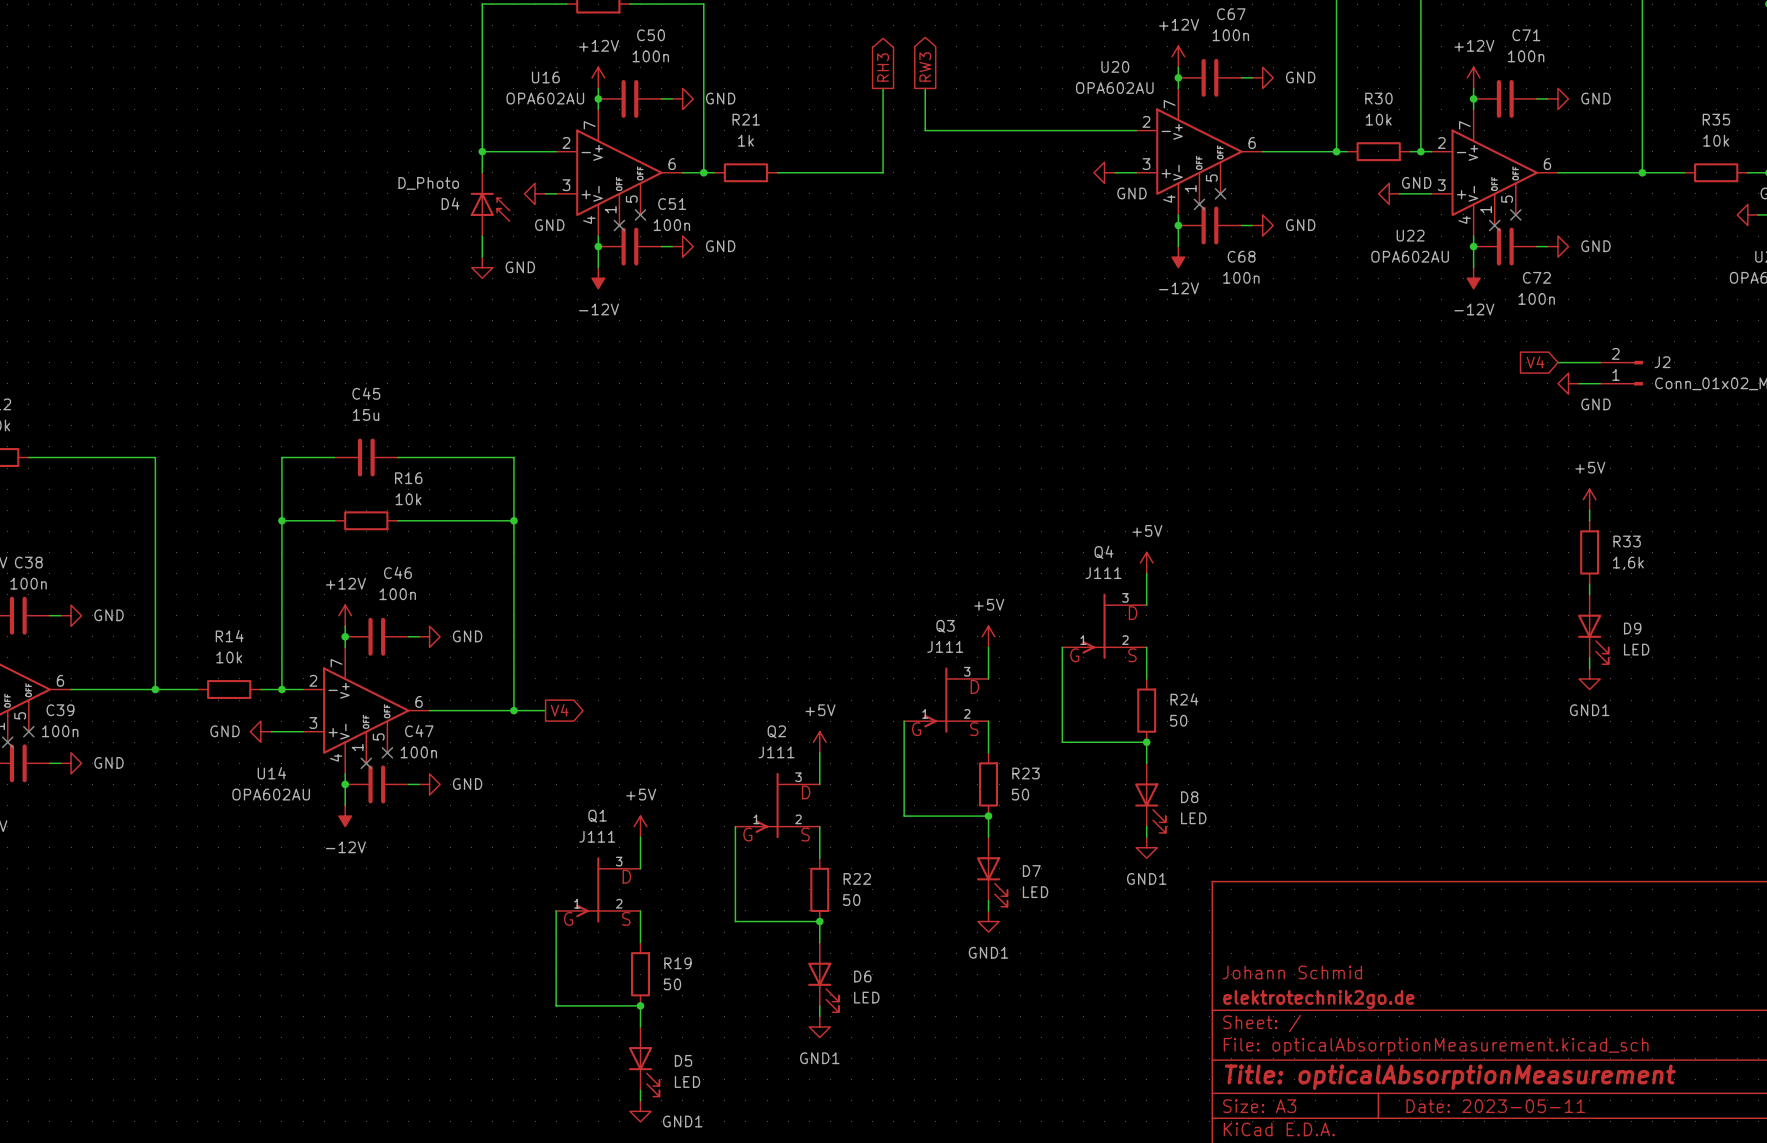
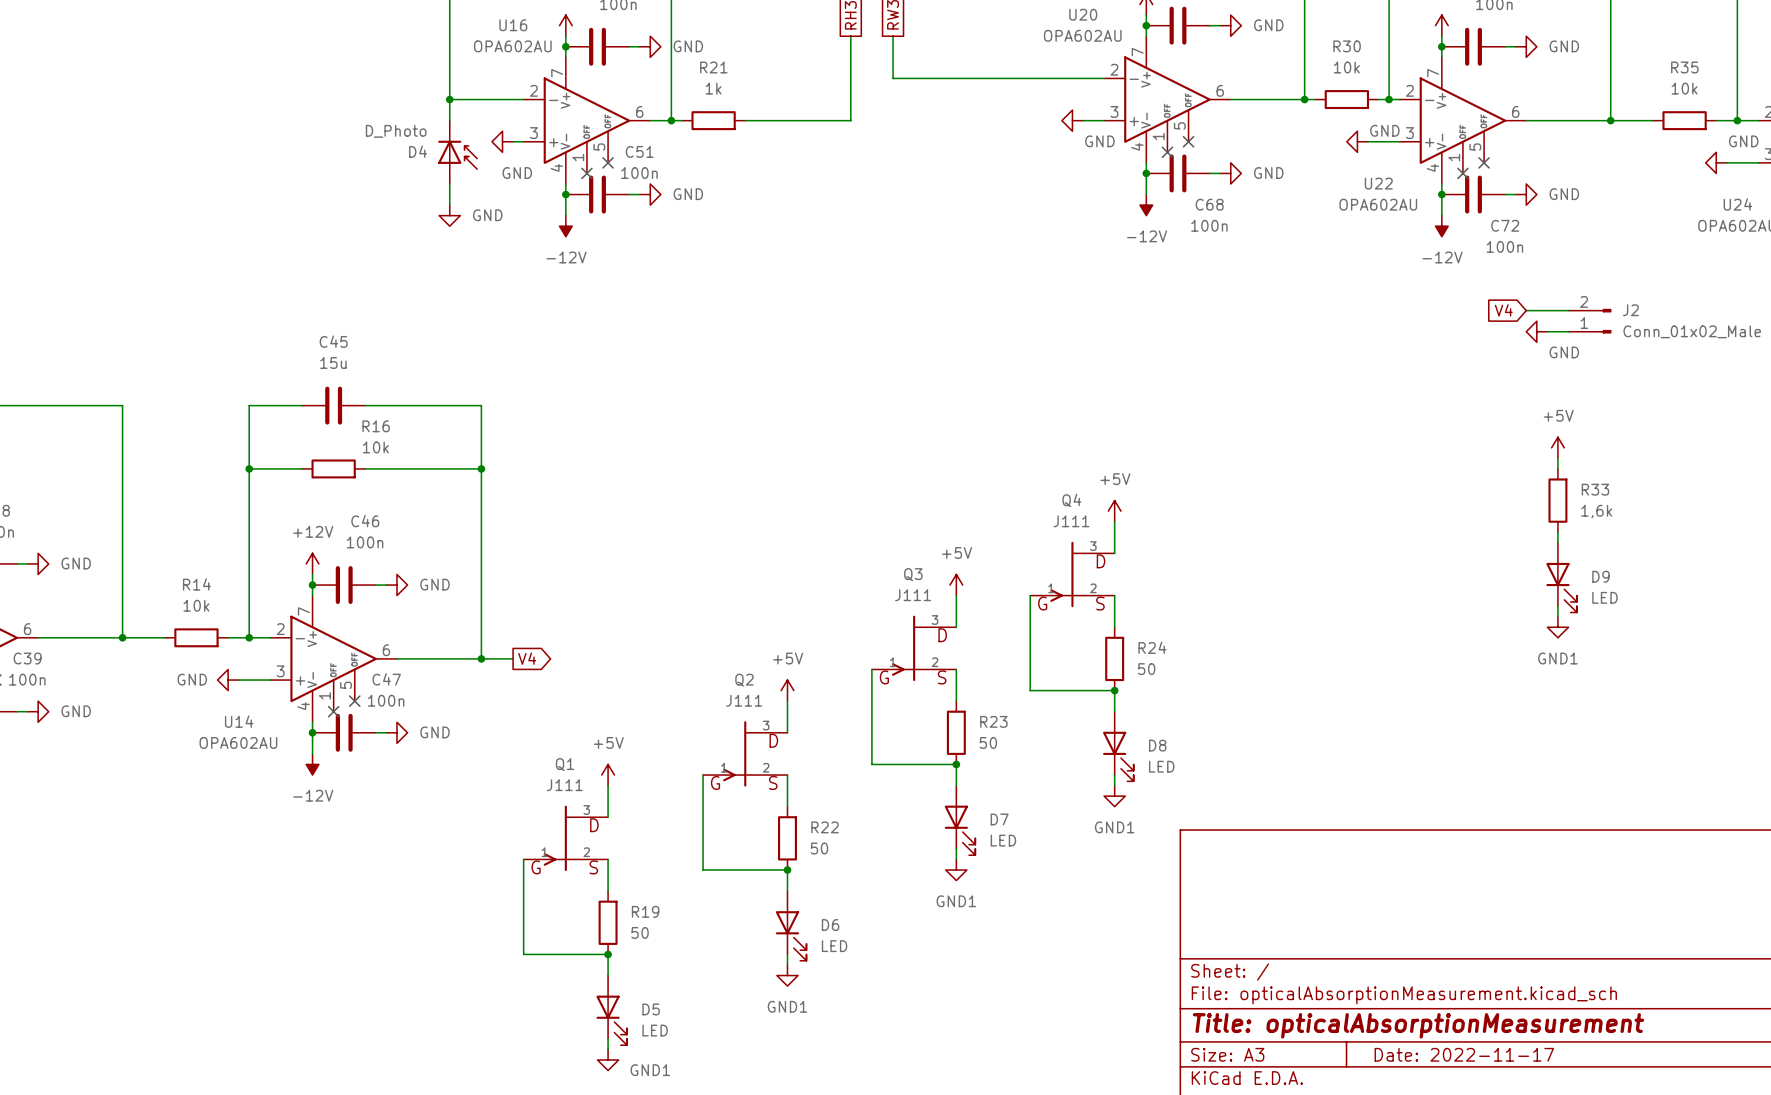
title block: Johann Schmid (1292, 972) -> none
title block: elektrotechnik2go.de (1318, 999) -> none
title block: Date: 2023-05-11 (1495, 1106) -> Date: 2022-11-17 (1464, 1054)

